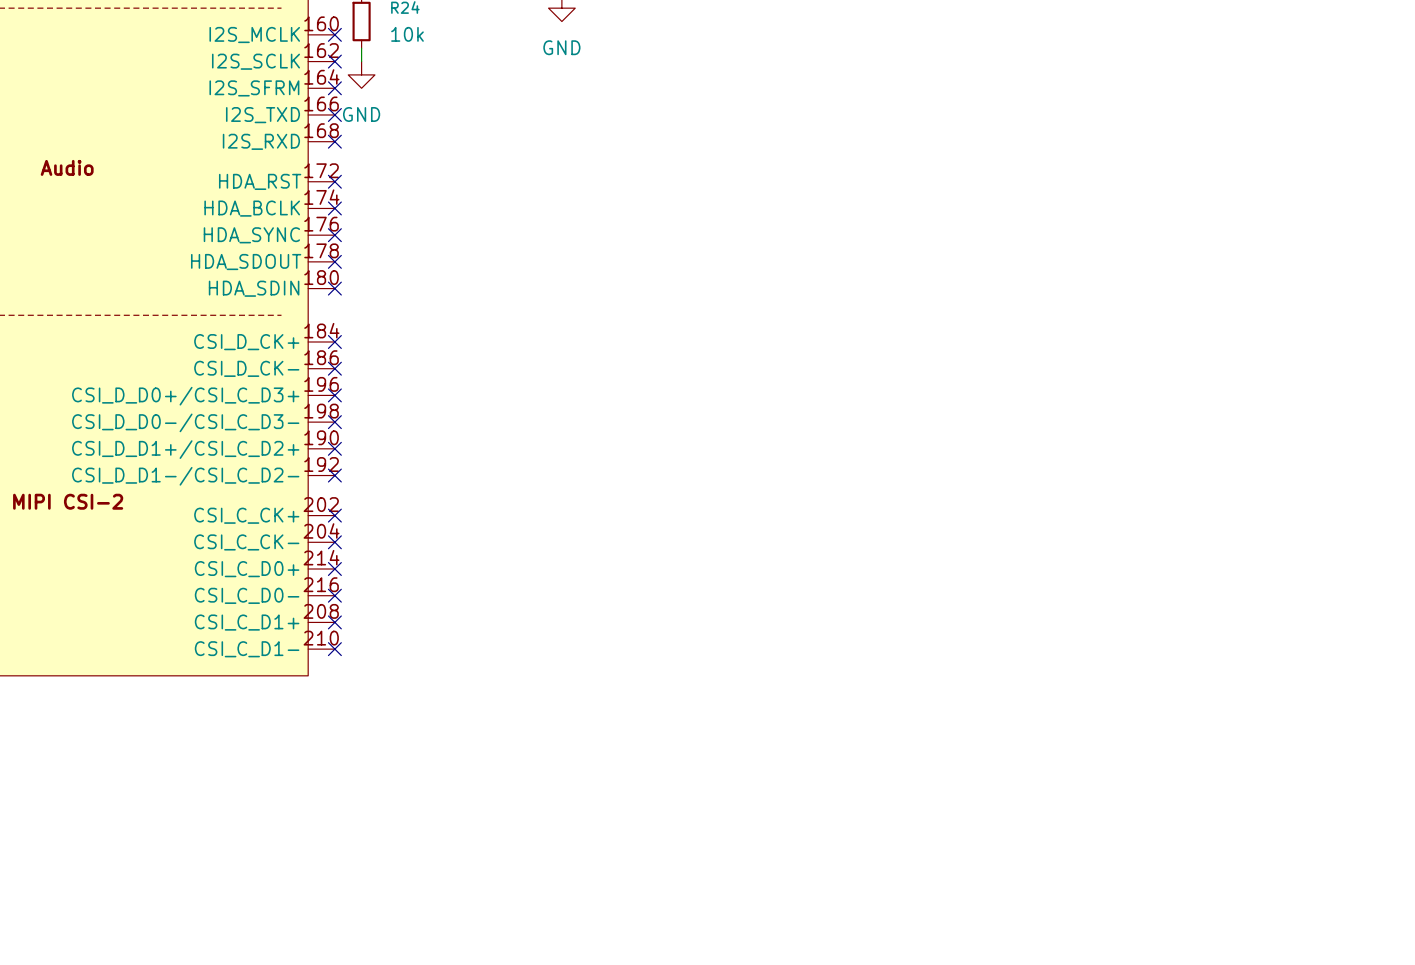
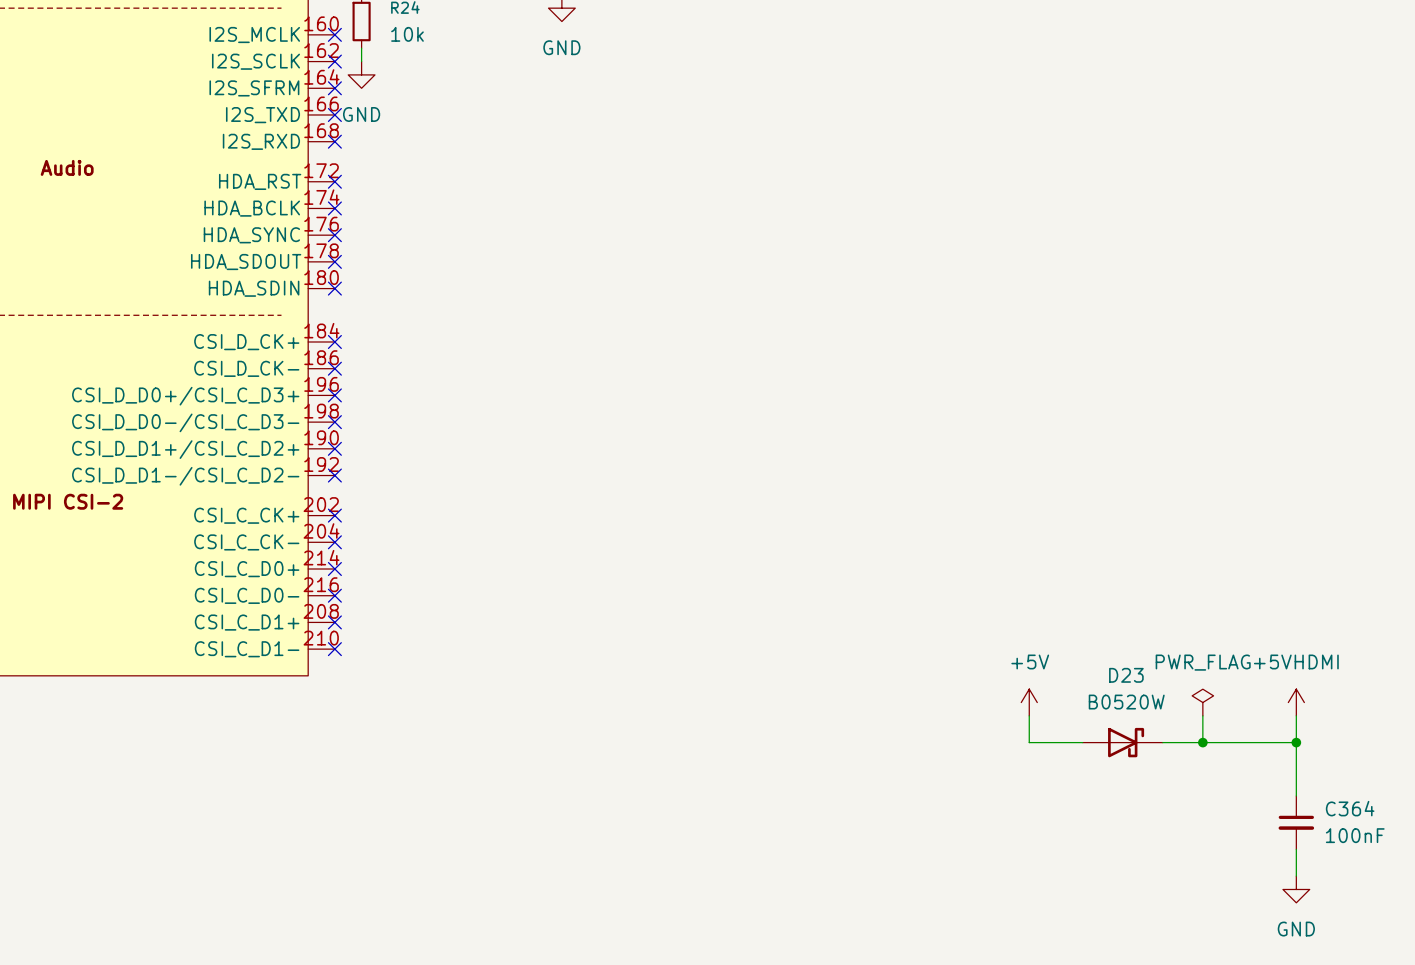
power symbol: none -> +5V (1029, 702)
power symbol: none -> PWR_FLAG (1202, 702)
power symbol: none -> +5VHDMI (1296, 702)
wire: none -> (1029, 715) (1029, 742) (1082, 742)
wire: none -> (1202, 715) (1202, 742)
wire: none -> (1296, 715) (1296, 796)
D23: none -> B0520W (1122, 742)
wire: none -> (1162, 742) (1296, 742)
junction: none -> (1202, 742)
junction: none -> (1296, 742)
C364: none -> 100nF (1296, 822)
wire: none -> (1296, 849) (1296, 876)
power symbol: none -> GND (1296, 889)

